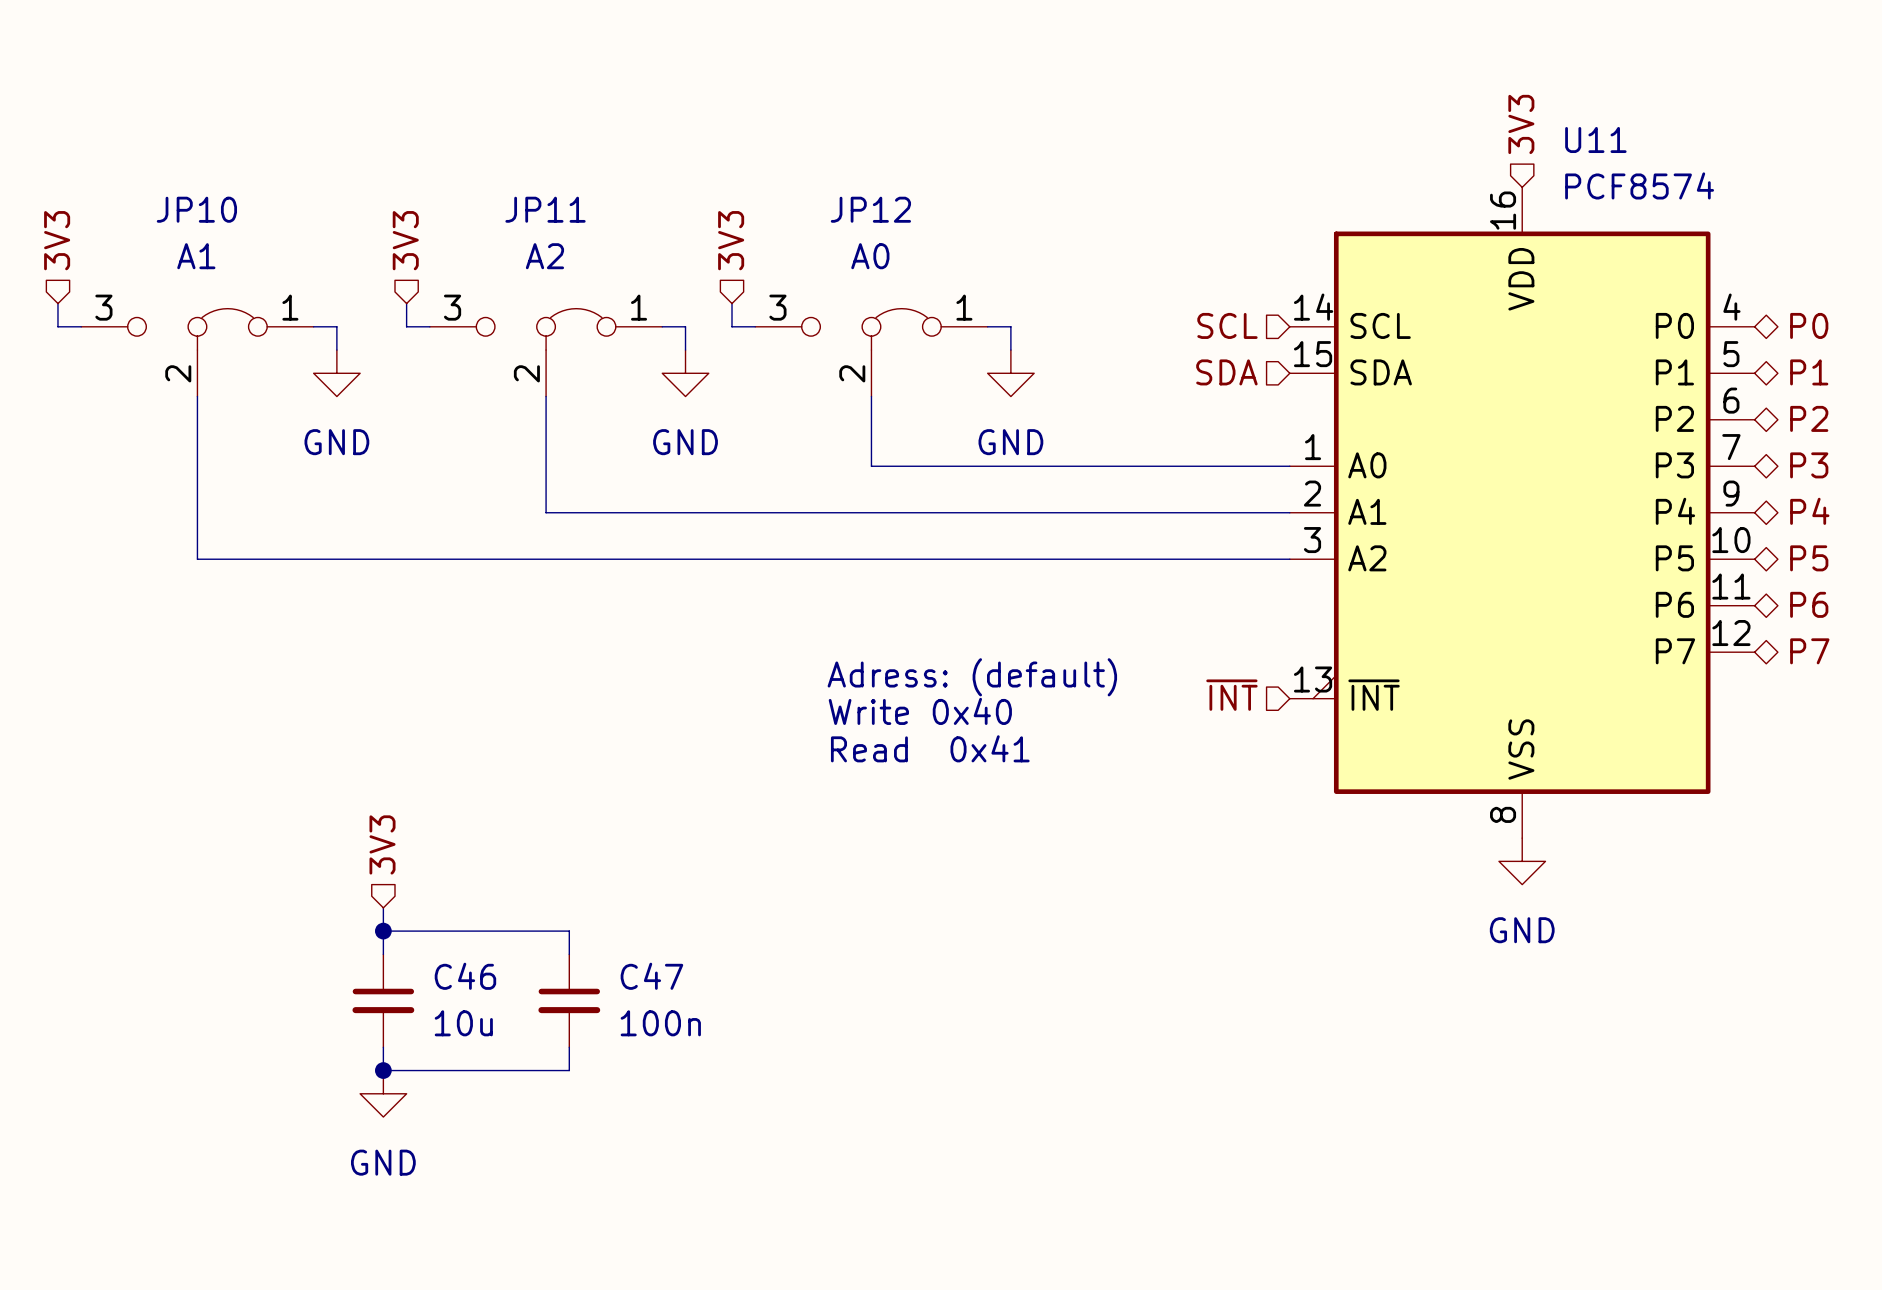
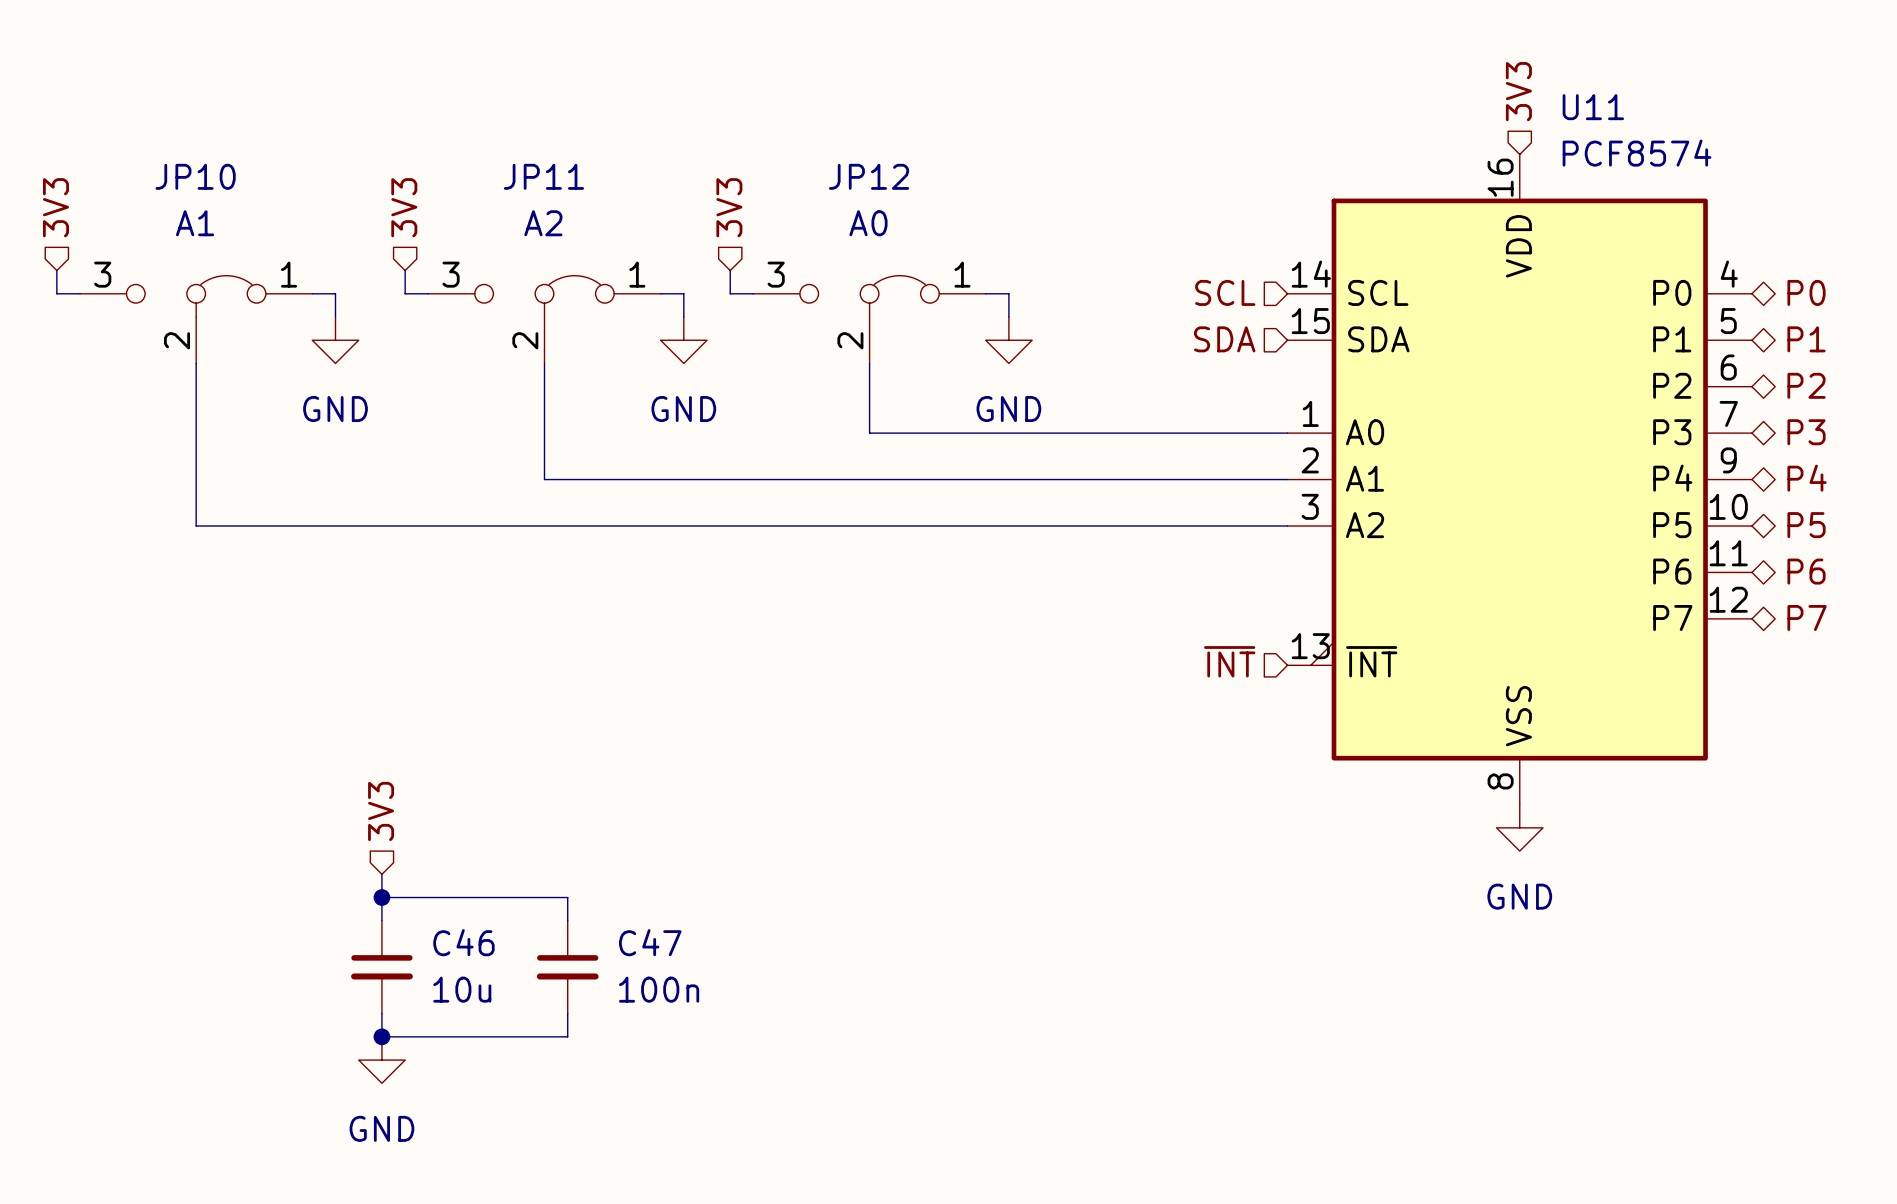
text: Adress: (default) (972, 677) -> none
text: Write 0x40 (920, 711) -> none
text: Read 0x41 (930, 748) -> none

